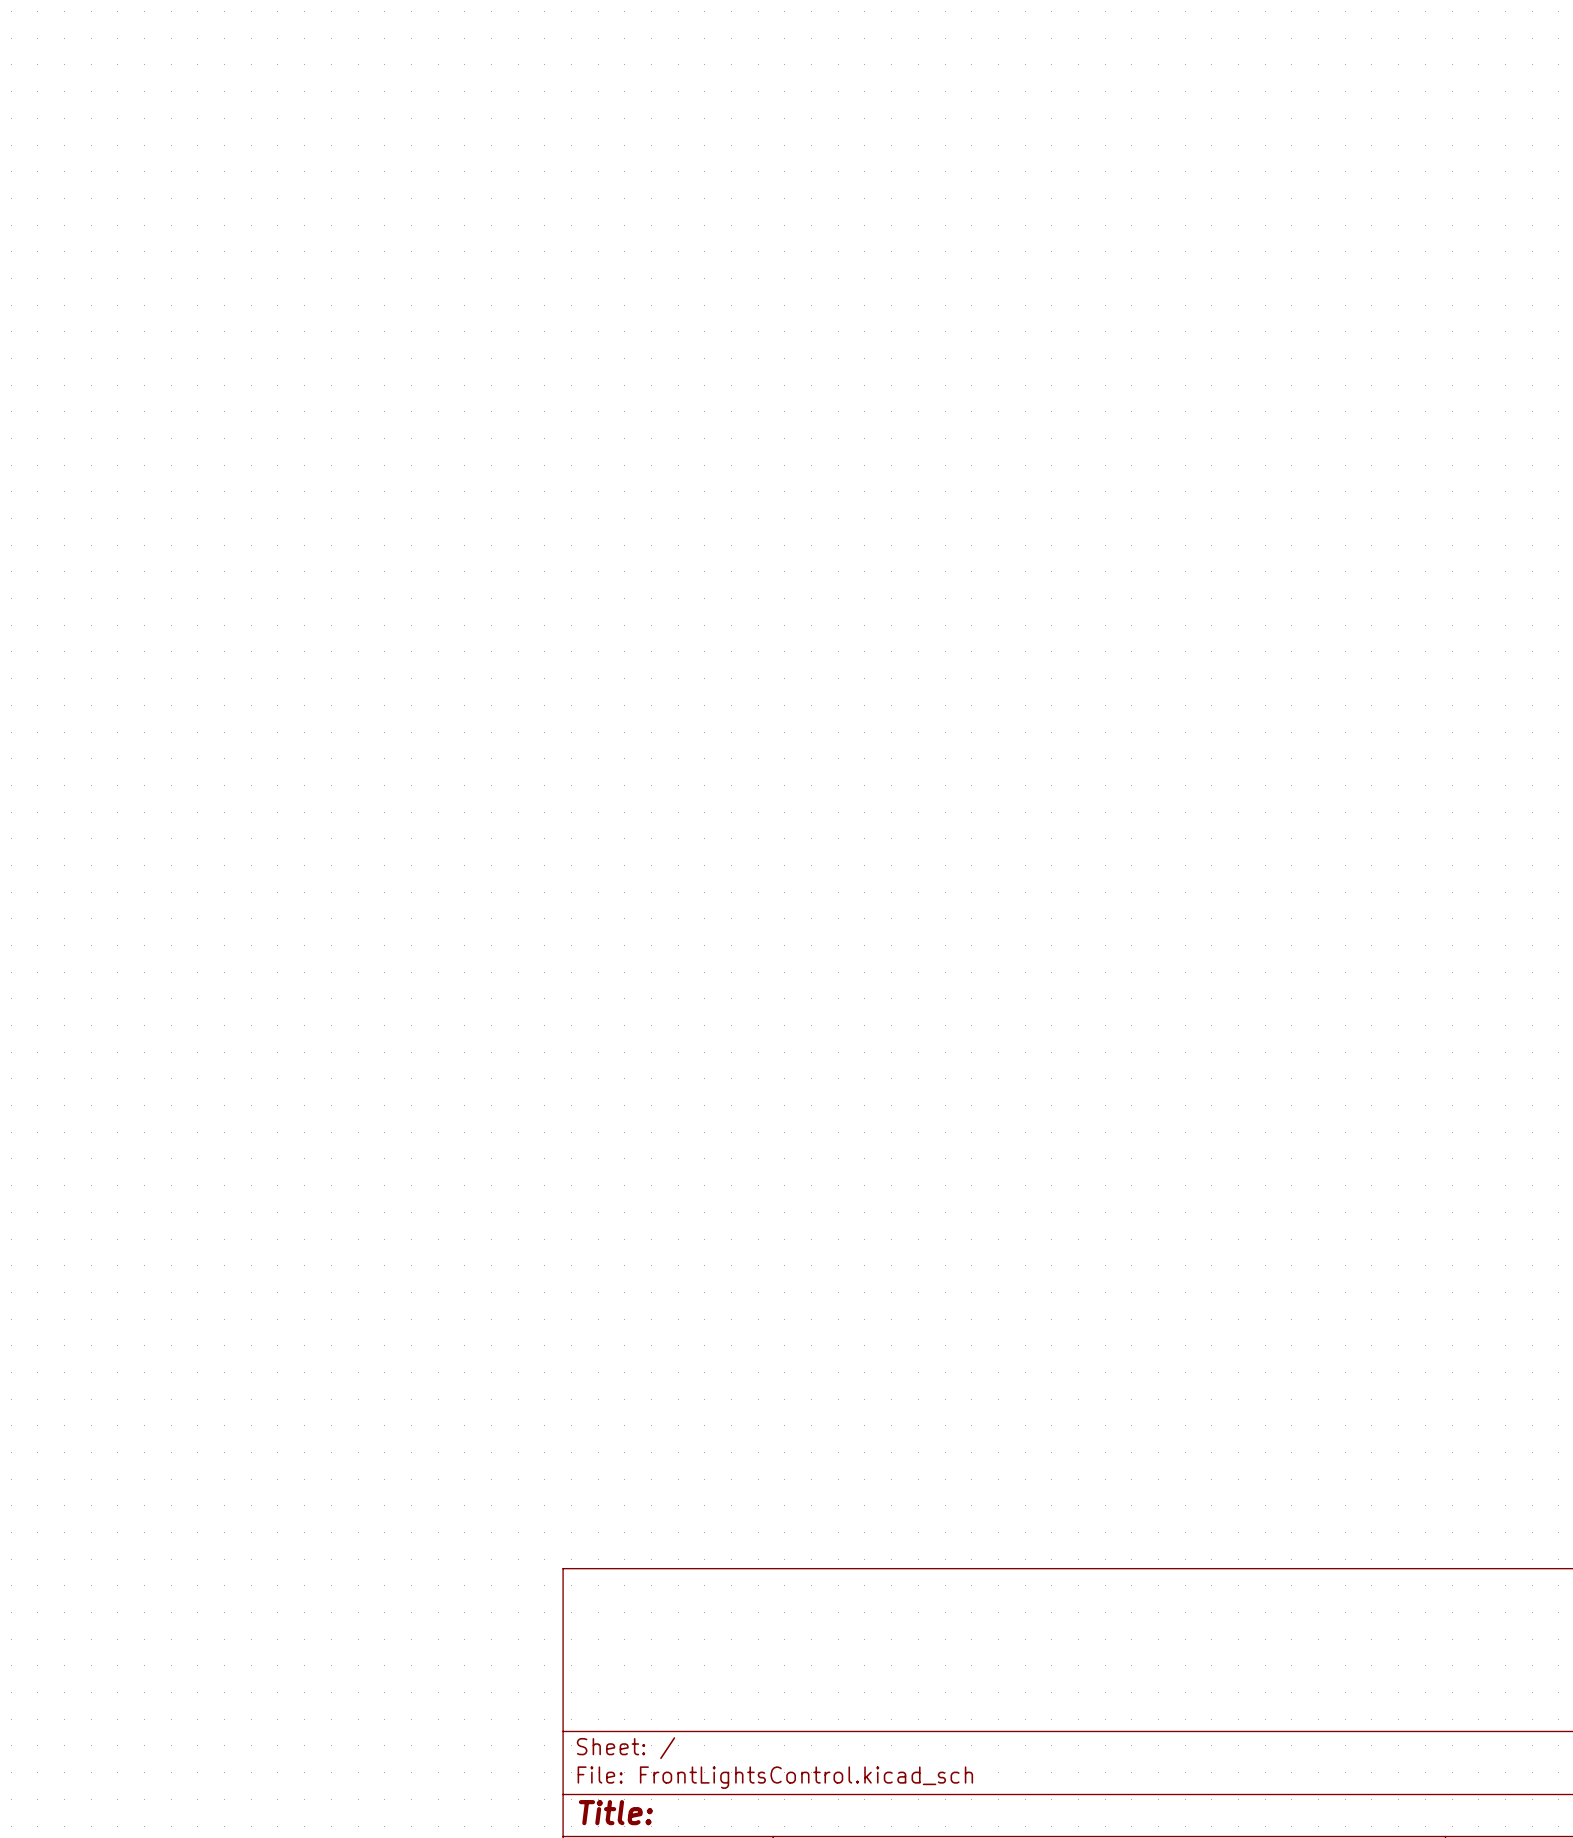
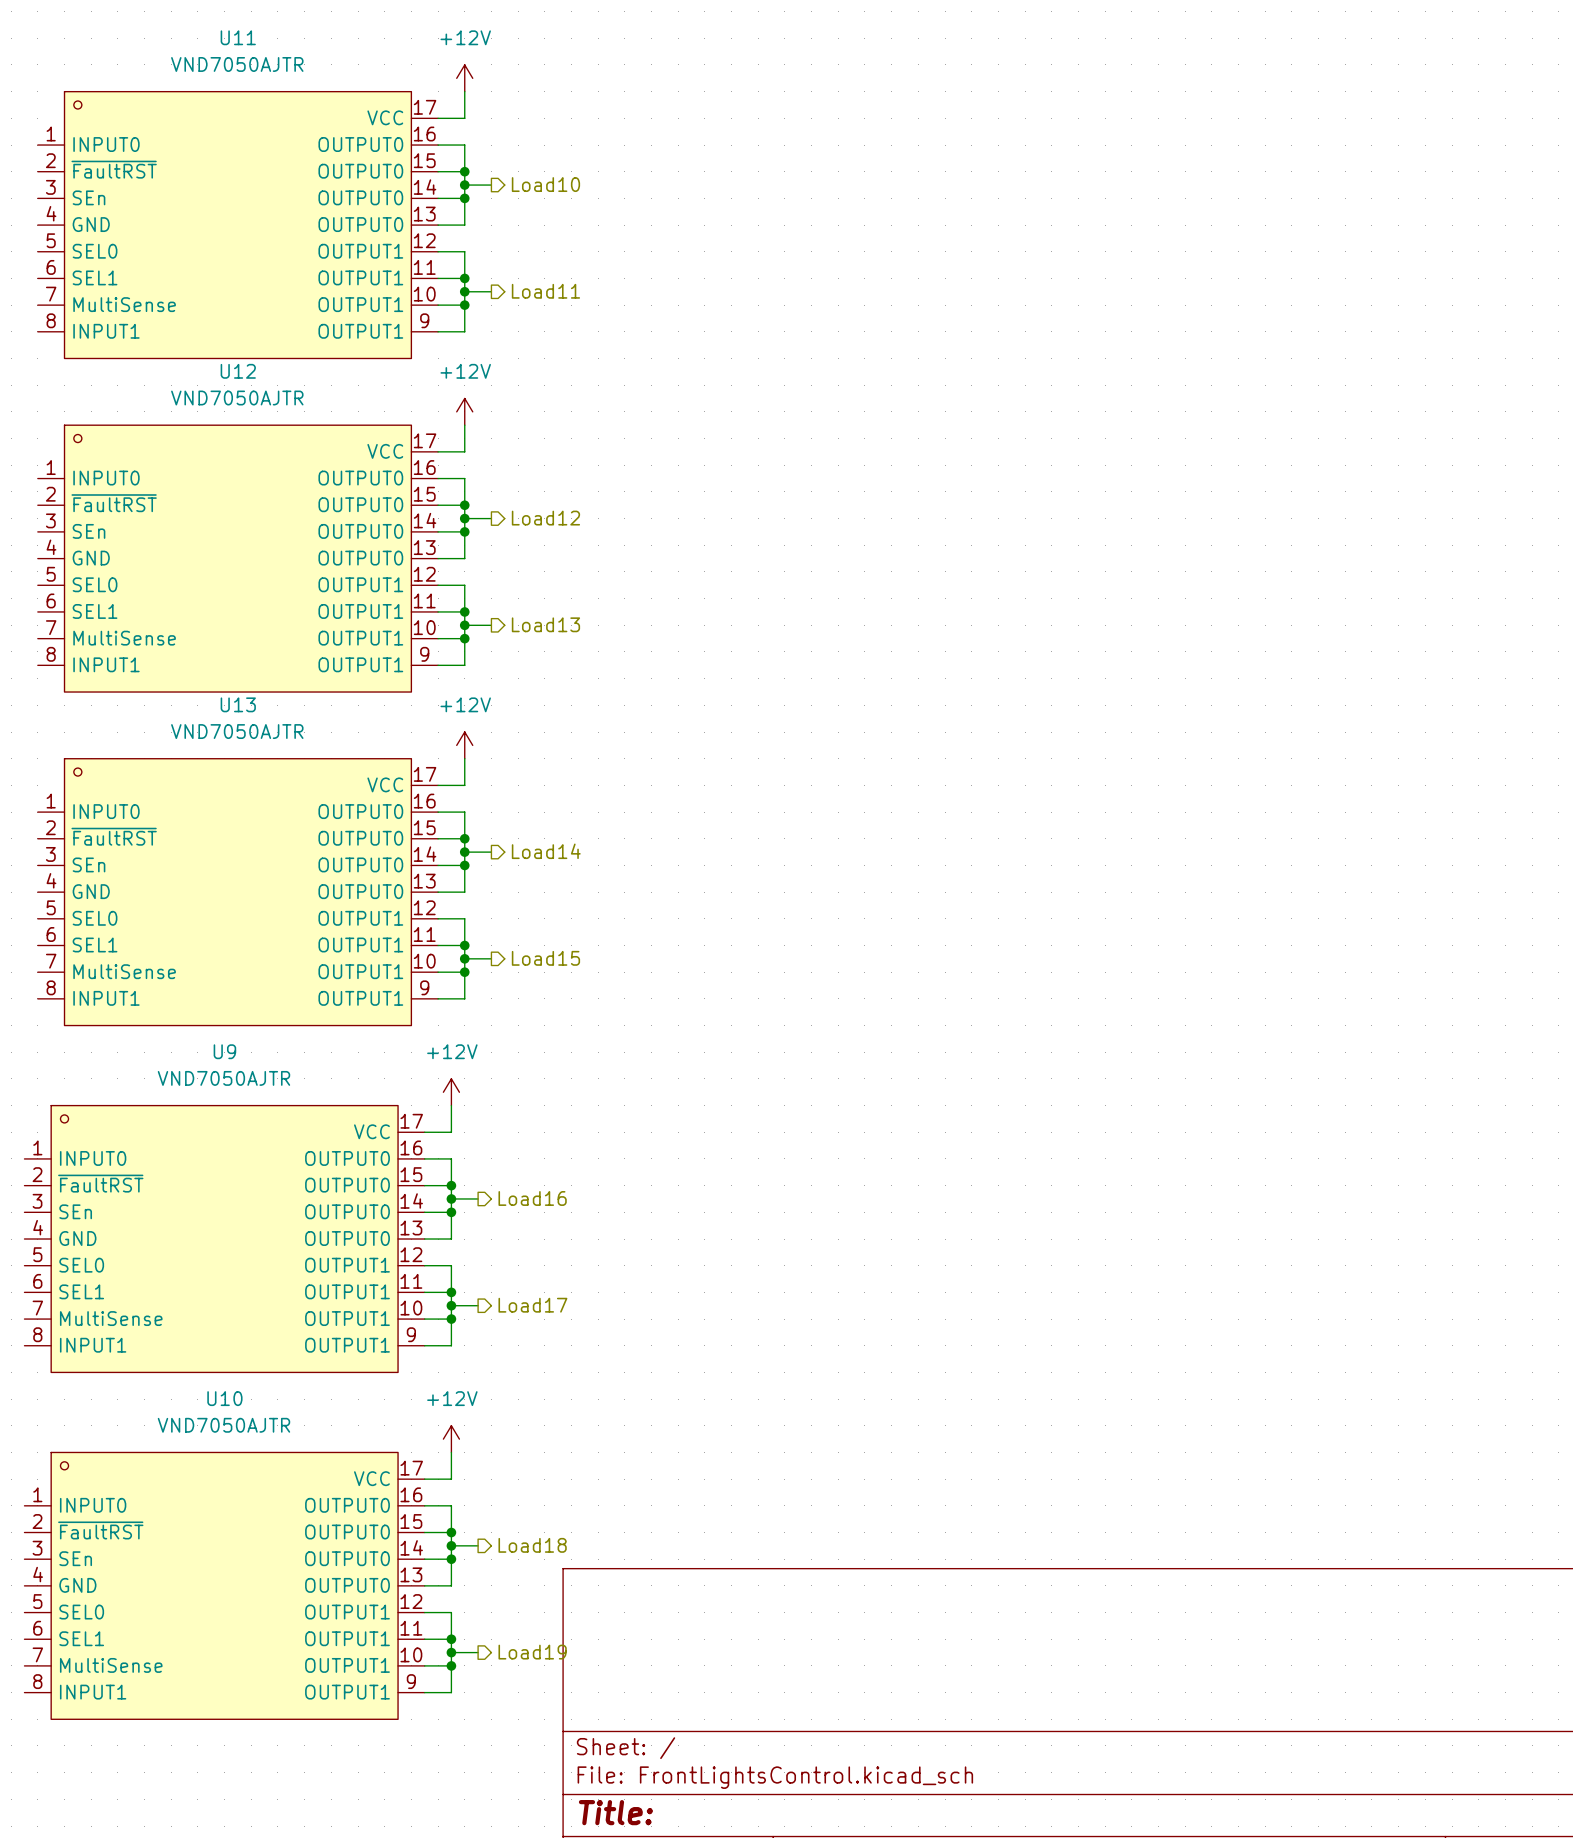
power symbol: none -> +12V (464, 78)
wire: none -> (464, 91) (464, 118) (438, 118)
wire: none -> (438, 145) (464, 145) (464, 225) (438, 225)
wire: none -> (438, 171) (464, 171)
junction: none -> (464, 171)
hierarchical label: none -> Load10 (545, 184)
wire: none -> (464, 185) (491, 185)
junction: none -> (464, 185)
wire: none -> (438, 198) (464, 198)
junction: none -> (464, 198)
U11: none -> VND7050AJTR (237, 225)
wire: none -> (438, 251) (464, 251) (464, 331) (438, 331)
wire: none -> (438, 278) (464, 278)
junction: none -> (464, 278)
wire: none -> (464, 291) (491, 291)
junction: none -> (464, 291)
hierarchical label: none -> Load11 (545, 291)
wire: none -> (438, 305) (464, 305)
junction: none -> (464, 305)
power symbol: none -> +12V (464, 411)
wire: none -> (464, 425) (464, 451) (438, 451)
wire: none -> (438, 478) (464, 478) (464, 558) (438, 558)
wire: none -> (438, 505) (464, 505)
junction: none -> (464, 505)
wire: none -> (464, 518) (491, 518)
junction: none -> (464, 518)
hierarchical label: none -> Load12 (545, 518)
wire: none -> (438, 531) (464, 531)
junction: none -> (464, 531)
U12: none -> VND7050AJTR (237, 558)
wire: none -> (438, 585) (464, 585) (464, 665) (438, 665)
wire: none -> (438, 611) (464, 611)
junction: none -> (464, 611)
hierarchical label: none -> Load13 (545, 624)
wire: none -> (464, 625) (491, 625)
junction: none -> (464, 625)
wire: none -> (438, 638) (464, 638)
junction: none -> (464, 638)
power symbol: none -> +12V (464, 745)
wire: none -> (464, 758) (464, 785) (438, 785)
wire: none -> (438, 812) (464, 812) (464, 892) (438, 892)
wire: none -> (438, 838) (464, 838)
junction: none -> (464, 838)
hierarchical label: none -> Load14 (546, 851)
wire: none -> (464, 852) (491, 852)
junction: none -> (464, 852)
wire: none -> (438, 865) (464, 865)
junction: none -> (464, 865)
U13: none -> VND7050AJTR (237, 892)
wire: none -> (438, 918) (464, 918) (464, 998) (438, 998)
wire: none -> (438, 945) (464, 945)
junction: none -> (464, 945)
wire: none -> (464, 958) (491, 958)
junction: none -> (464, 958)
hierarchical label: none -> Load15 (545, 958)
wire: none -> (438, 972) (464, 972)
junction: none -> (464, 972)
power symbol: none -> +12V (451, 1092)
wire: none -> (451, 1105) (451, 1132) (424, 1132)
wire: none -> (424, 1158) (451, 1158) (451, 1239) (424, 1239)
wire: none -> (424, 1185) (451, 1185)
junction: none -> (451, 1185)
wire: none -> (451, 1198) (478, 1198)
junction: none -> (451, 1198)
hierarchical label: none -> Load16 (532, 1198)
wire: none -> (424, 1212) (451, 1212)
junction: none -> (451, 1212)
U9: none -> VND7050AJTR (224, 1239)
wire: none -> (424, 1265) (451, 1265) (451, 1345) (424, 1345)
wire: none -> (424, 1292) (451, 1292)
junction: none -> (451, 1292)
wire: none -> (451, 1305) (478, 1305)
junction: none -> (451, 1305)
hierarchical label: none -> Load17 (532, 1305)
wire: none -> (424, 1319) (451, 1319)
junction: none -> (451, 1319)
power symbol: none -> +12V (451, 1439)
wire: none -> (451, 1452) (451, 1479) (424, 1479)
wire: none -> (424, 1505) (451, 1505) (451, 1585) (424, 1585)
wire: none -> (424, 1532) (451, 1532)
junction: none -> (451, 1532)
wire: none -> (451, 1545) (478, 1545)
junction: none -> (451, 1545)
hierarchical label: none -> Load18 (532, 1545)
wire: none -> (424, 1559) (451, 1559)
junction: none -> (451, 1559)
U10: none -> VND7050AJTR (224, 1585)
wire: none -> (424, 1612) (451, 1612) (451, 1692) (424, 1692)
wire: none -> (424, 1639) (451, 1639)
junction: none -> (451, 1639)
wire: none -> (451, 1652) (478, 1652)
junction: none -> (451, 1652)
hierarchical label: none -> Load19 (532, 1652)
wire: none -> (424, 1665) (451, 1665)
junction: none -> (451, 1665)

